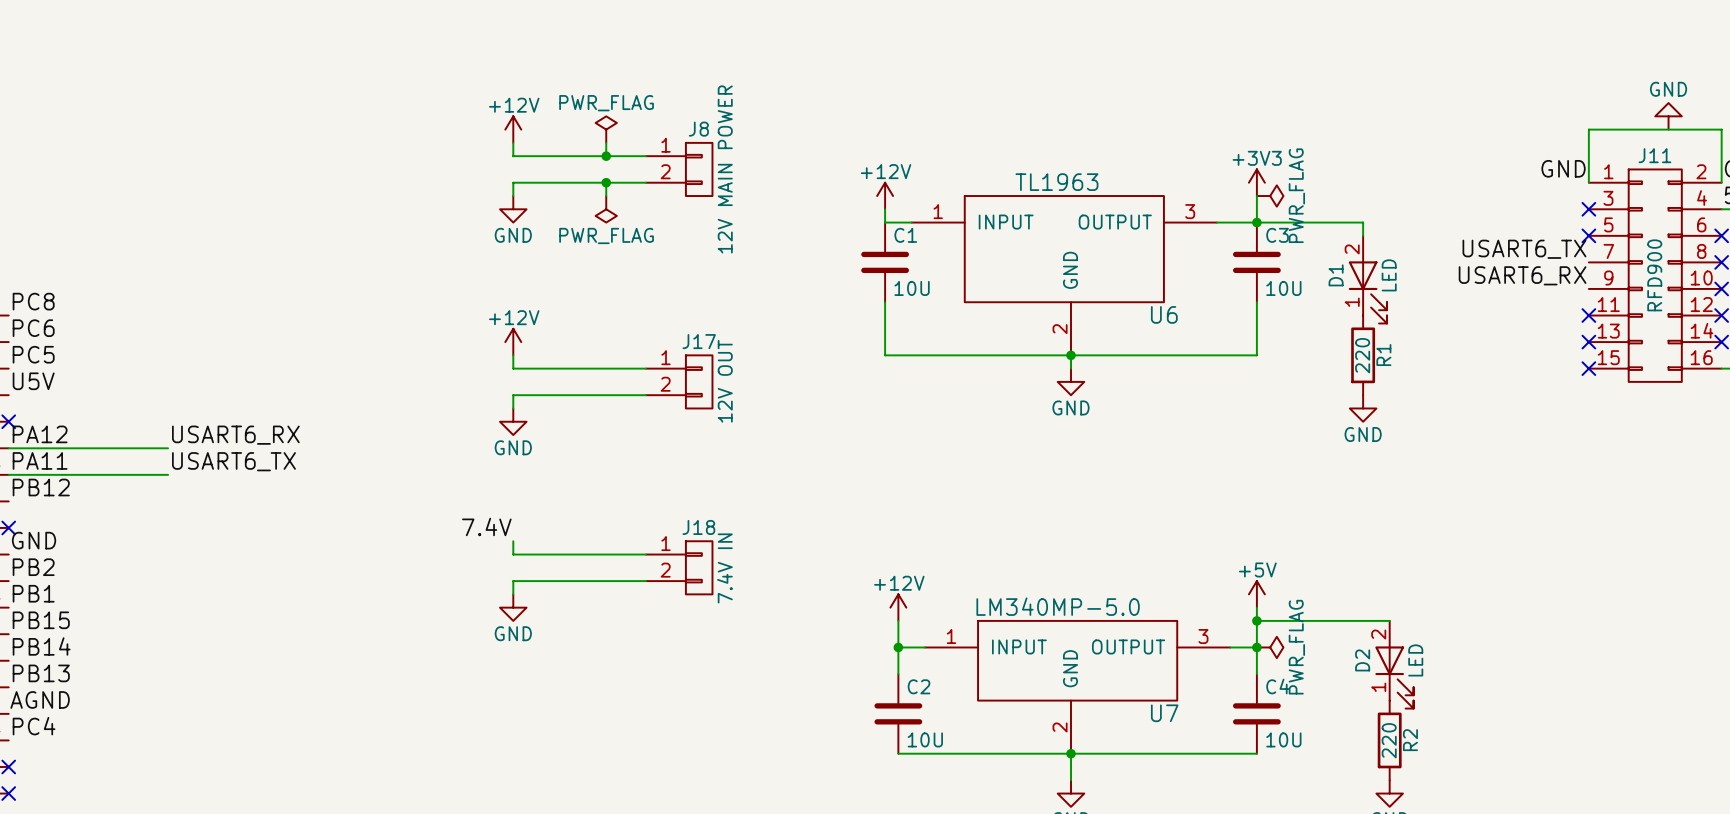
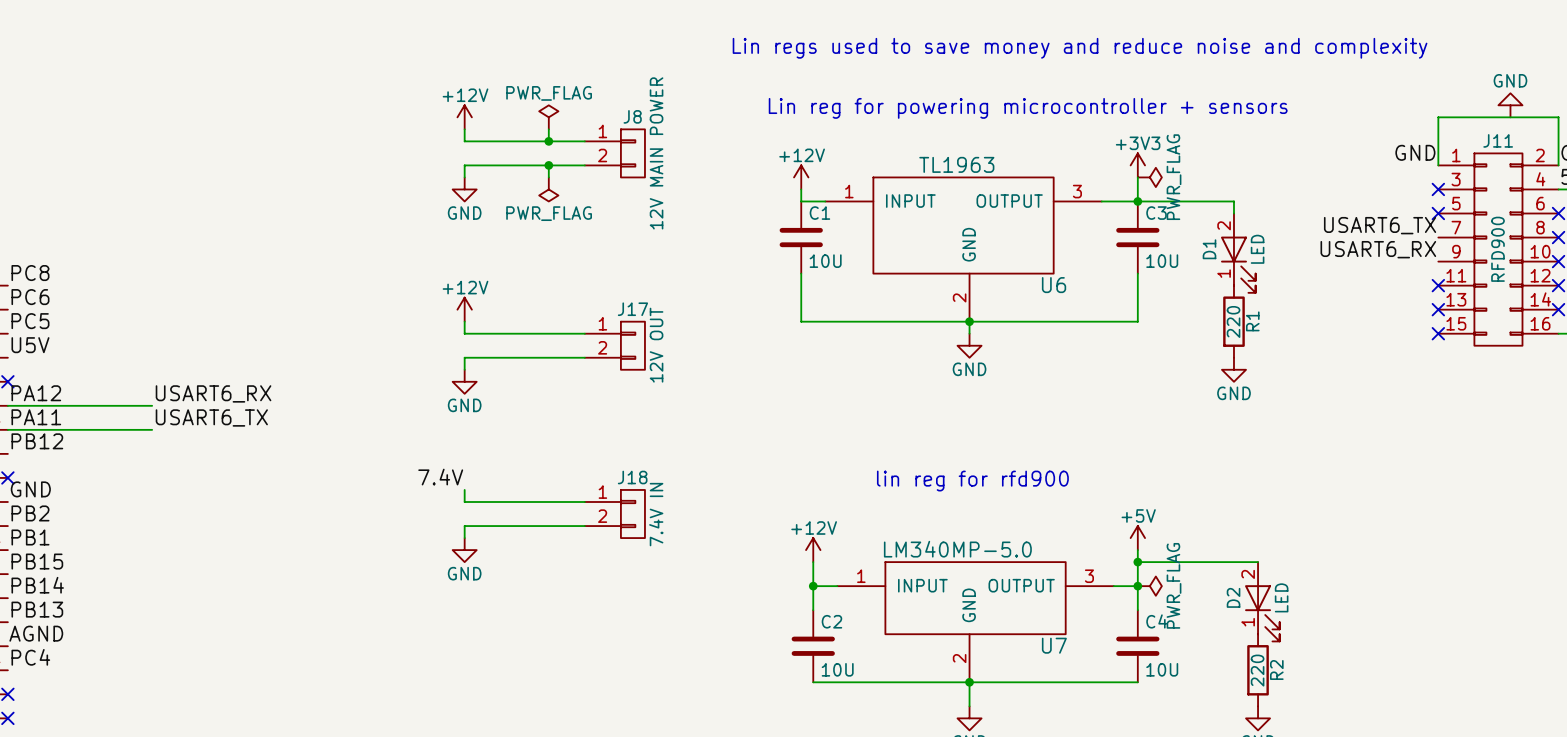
text: none -> Lin regs used to save money and reduce noise and complexity (1080, 48)
text: none -> Lin reg for powering microcontroller + sensors (1028, 108)
text: none -> lin reg for rfd900 (972, 481)

